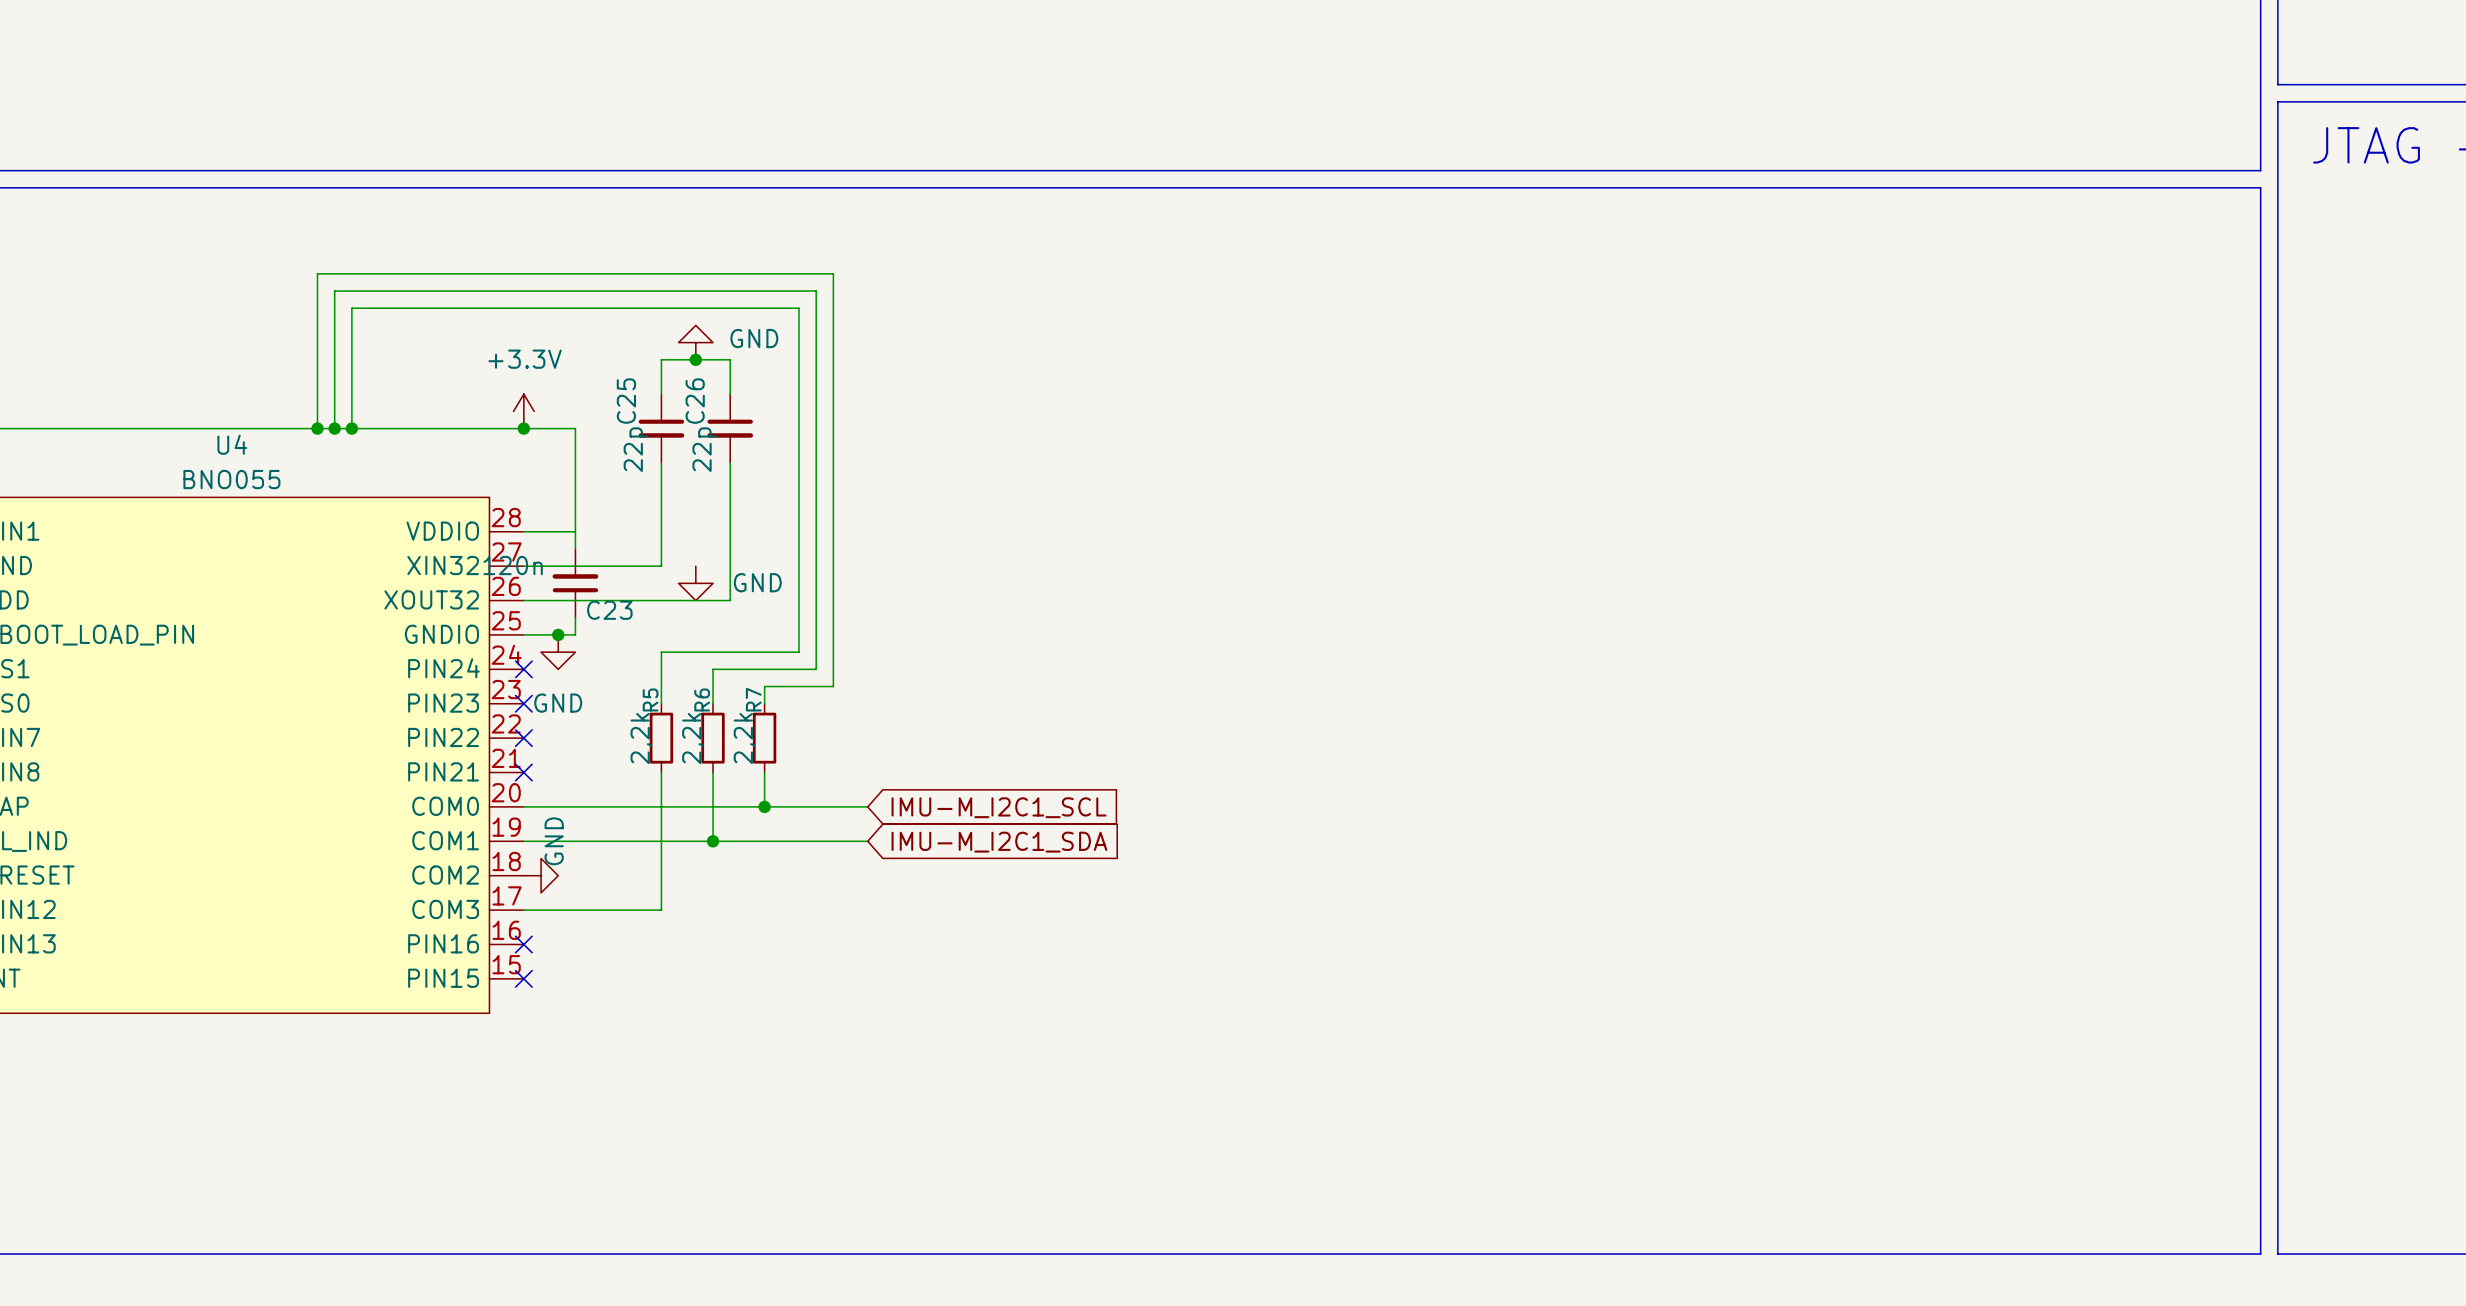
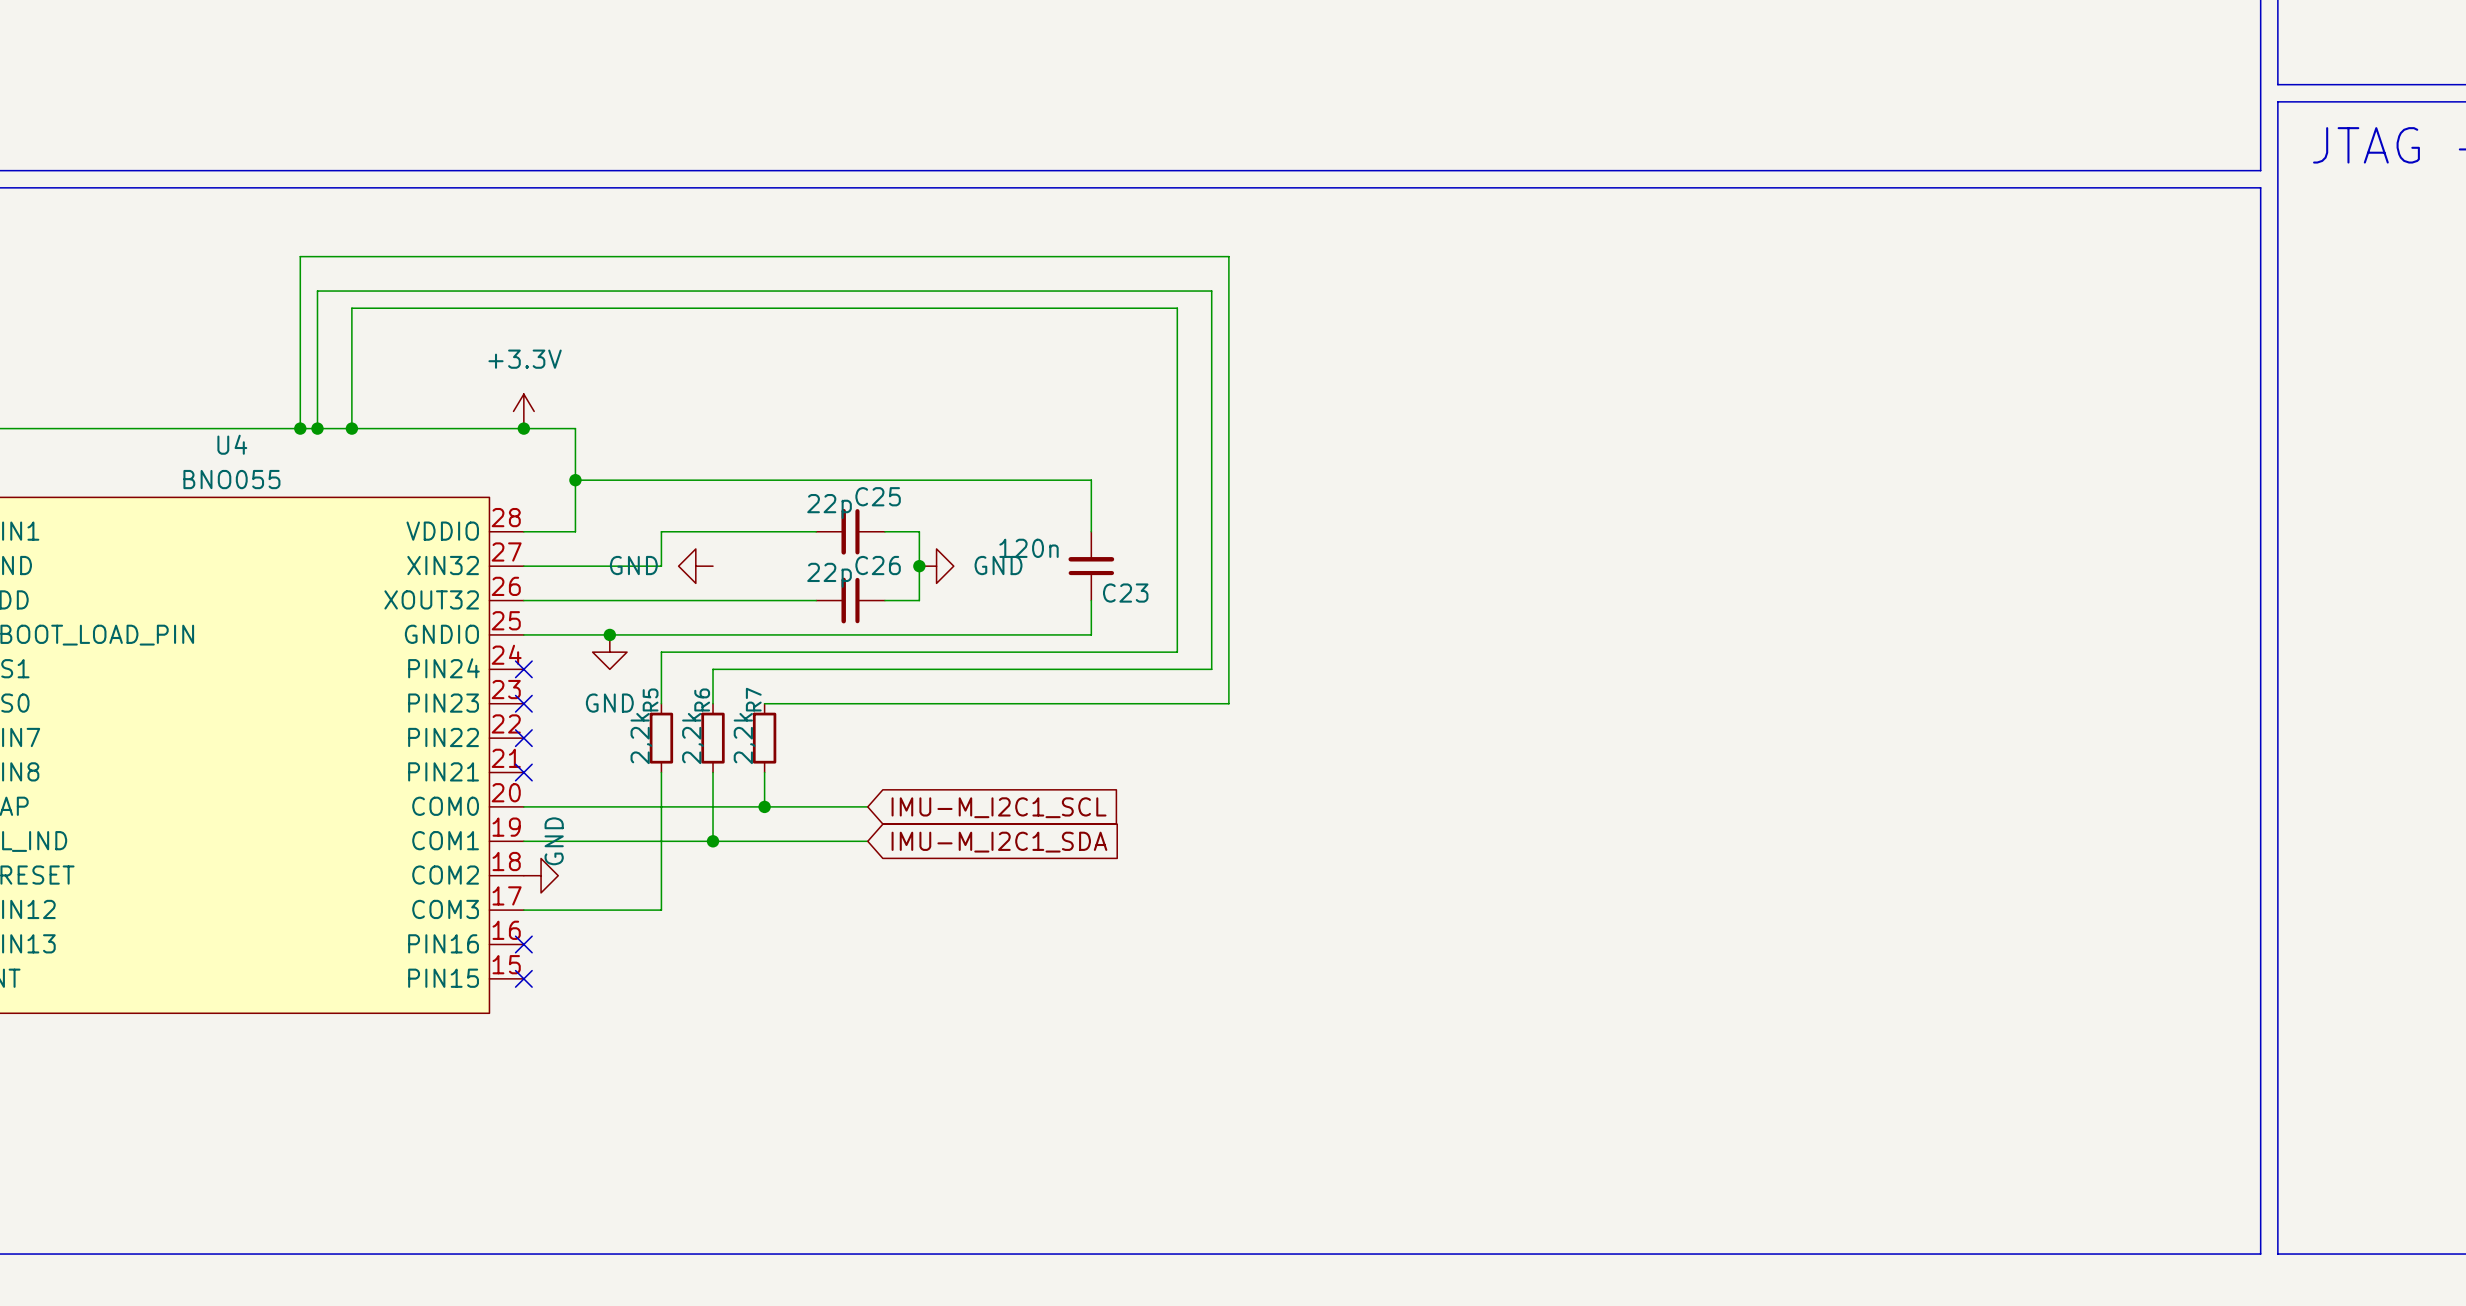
wire: (317, 291) (317, 273) (833, 273) (833, 686) (764, 686) (764, 703) -> (300, 428) (300, 256) (1228, 256) (1228, 703) (764, 703)
wire: (334, 291) (334, 428) -> (334, 291) (317, 291)
wire: (816, 291) (816, 669) -> (816, 291) (1211, 291) (1211, 669) (816, 669)
wire: (798, 308) (798, 652) -> (798, 308) (1177, 308) (1177, 652) (798, 652)
power symbol: GND (695, 342) -> none
junction: (695, 359) -> none
wire: (661, 394) (661, 359) (730, 359) (730, 394) -> none
junction position: (334, 428) -> (300, 428)
C25 rotation: 0° (661, 428) -> 90° clockwise (850, 531)
C25 position: (661, 428) -> (850, 531)
C26 rotation: 0° (730, 428) -> 90° clockwise (850, 600)
C26 position: (730, 428) -> (850, 600)
wire: (661, 462) (661, 531) -> (816, 531) (661, 531)
wire: (730, 462) (730, 600) -> (816, 600) (730, 600)
wire: none -> (575, 480) (1091, 480) (1091, 531)
junction: none -> (575, 480)
wire: (575, 531) (575, 548) -> none
wire: none -> (884, 531) (919, 531) (919, 600) (884, 600)
junction: none -> (919, 566)
power symbol: none -> GND (936, 566)
power symbol text position: GND (757, 582) -> GND (633, 565)
C23 position: (575, 583) -> (1091, 566)
power symbol rotation: 0° (695, 583) -> 90° clockwise (695, 566)
wire: (575, 617) (575, 634) -> (1091, 600) (1091, 634) (575, 634)
junction position: (558, 634) -> (609, 634)
power symbol position: GND (558, 652) -> GND (609, 652)

